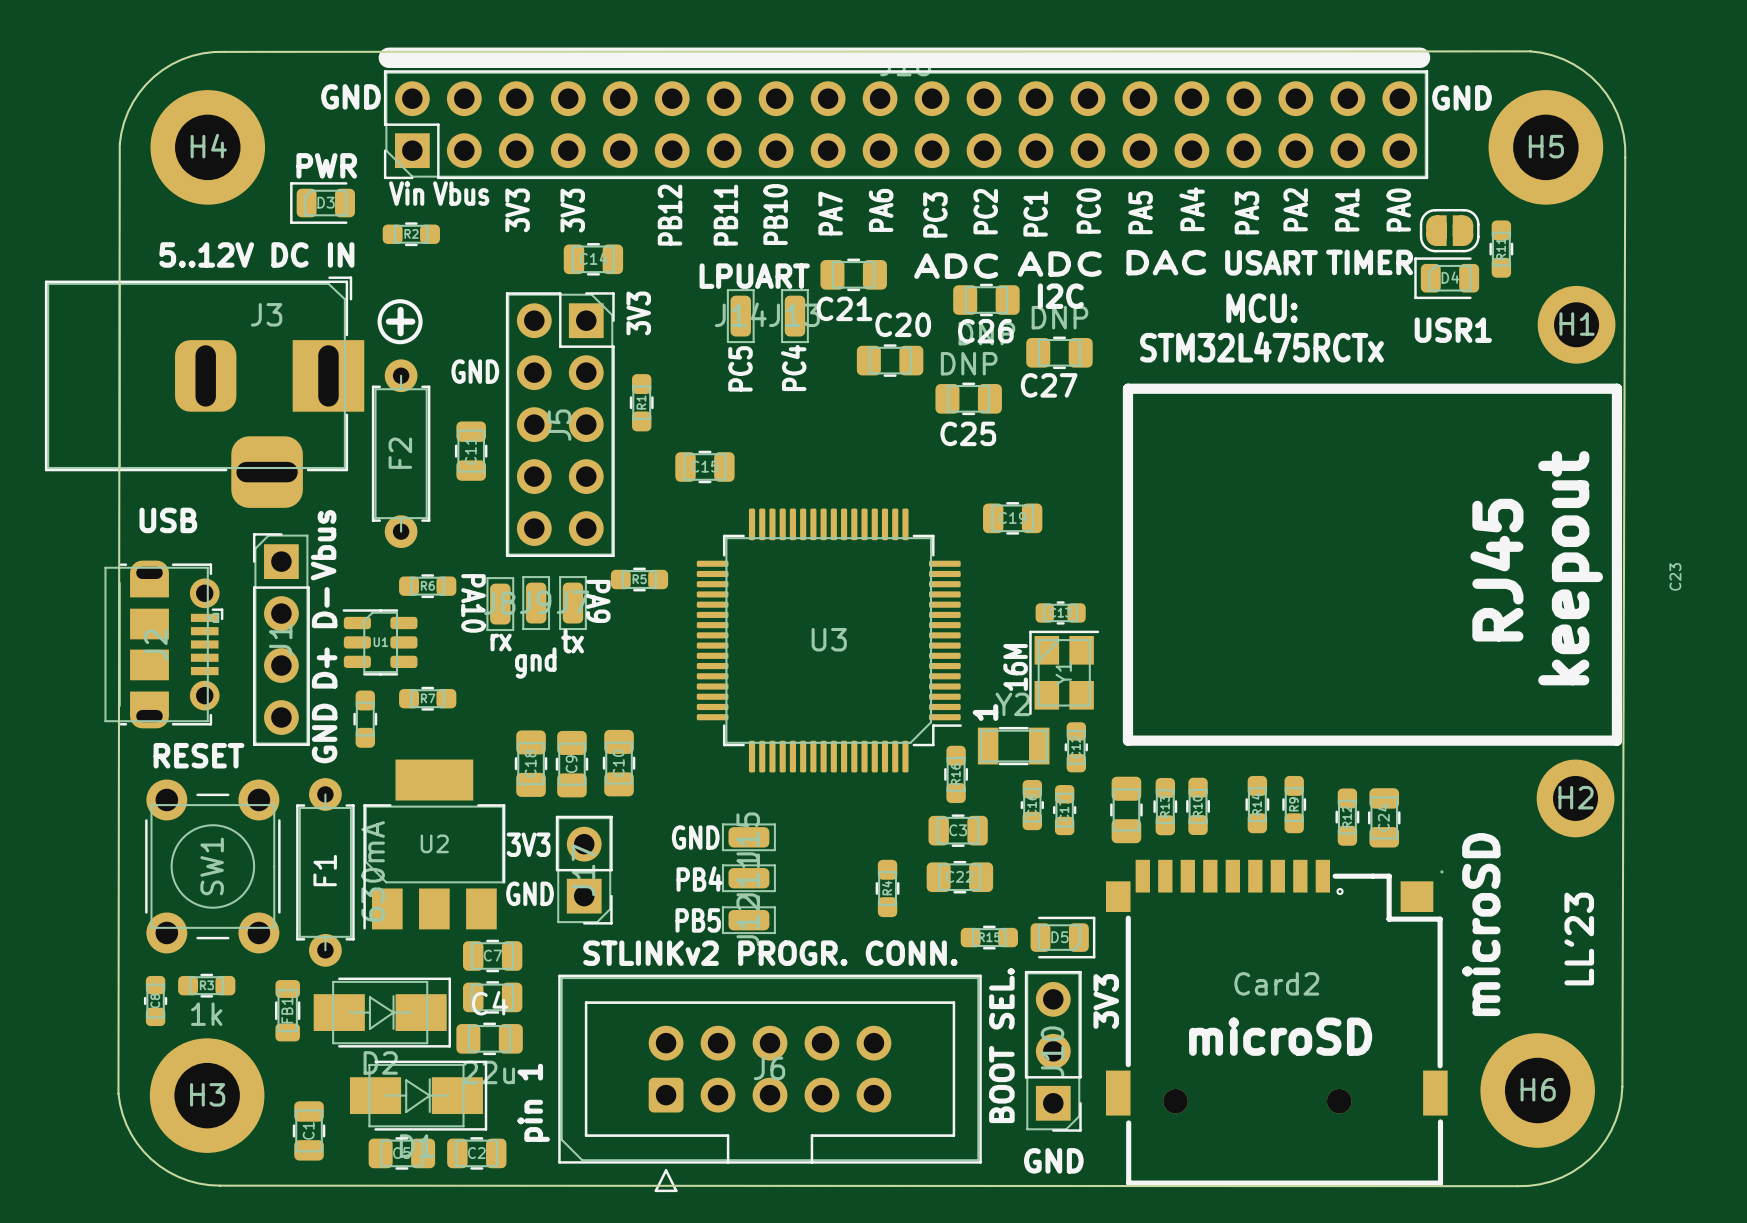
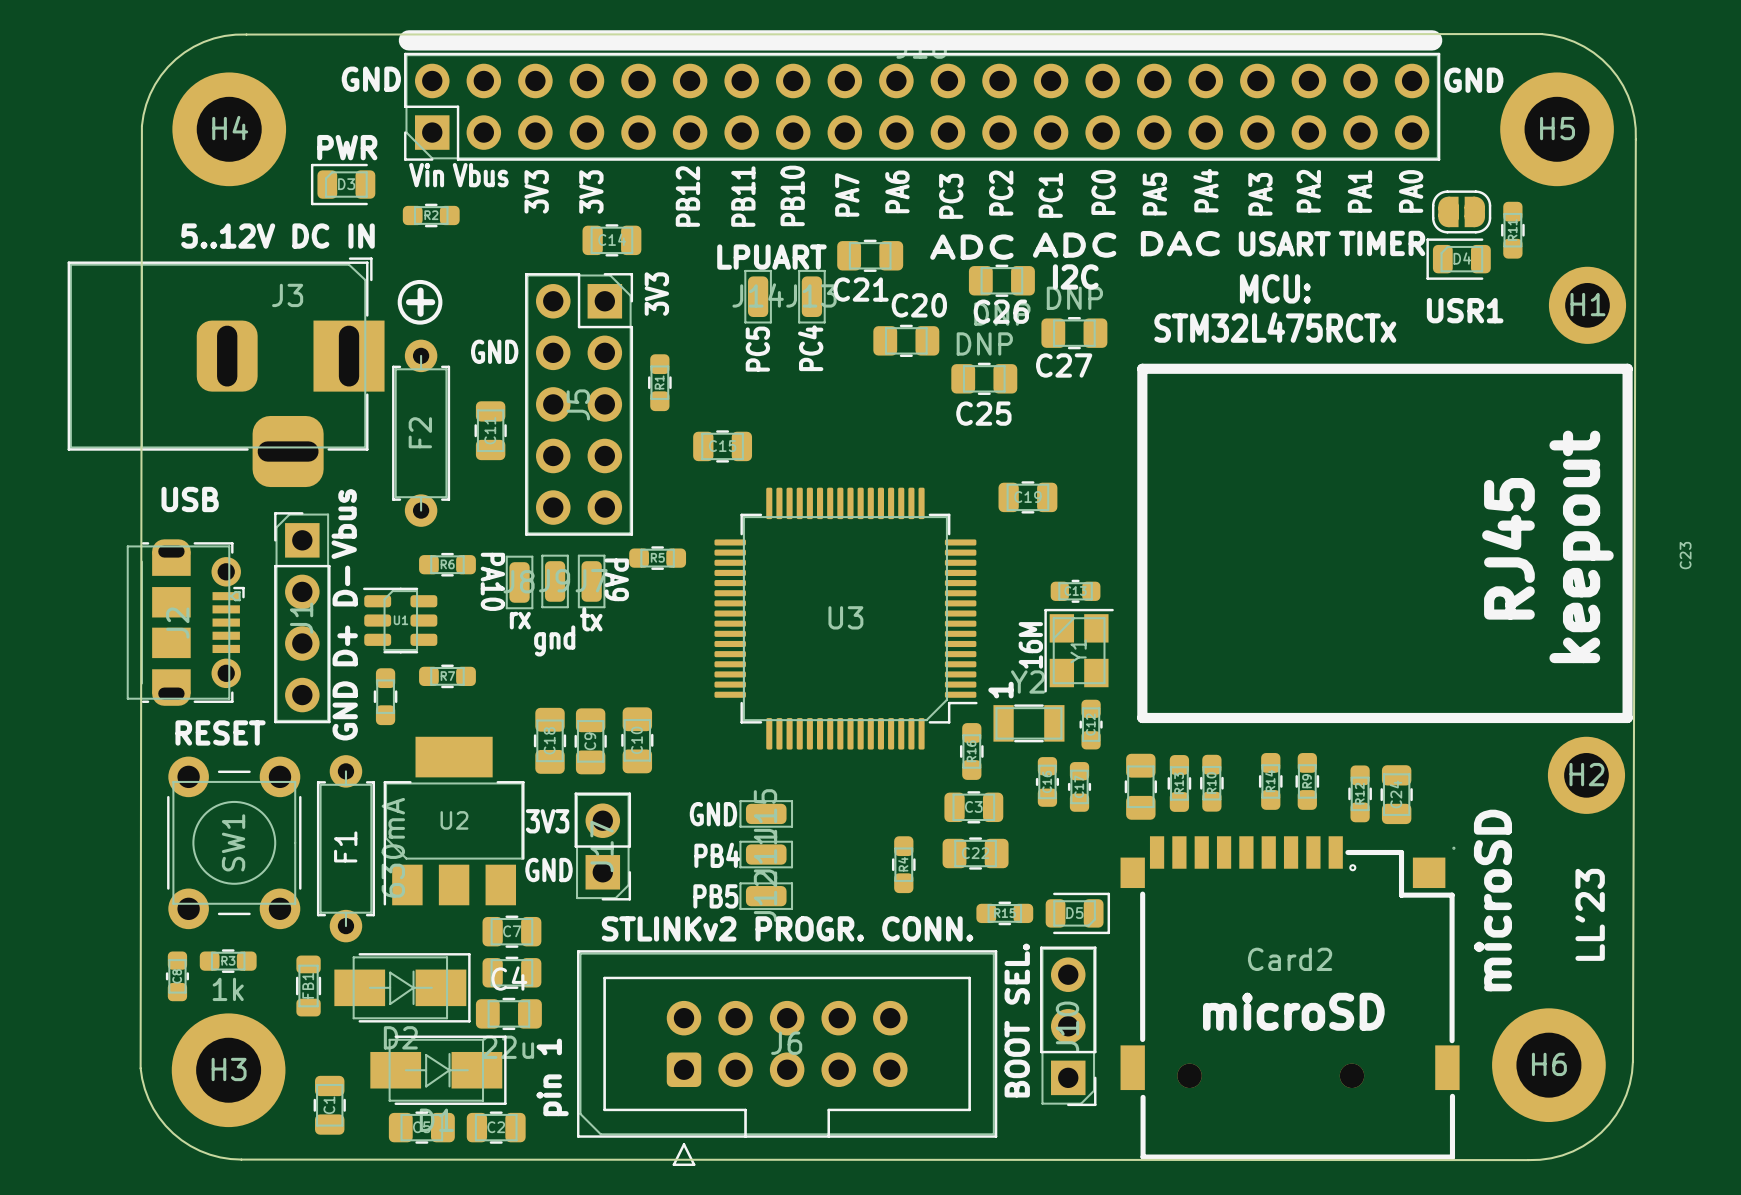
text: 3V3 (1106, 1001) -> none
text: GND (1053, 1160) -> none

